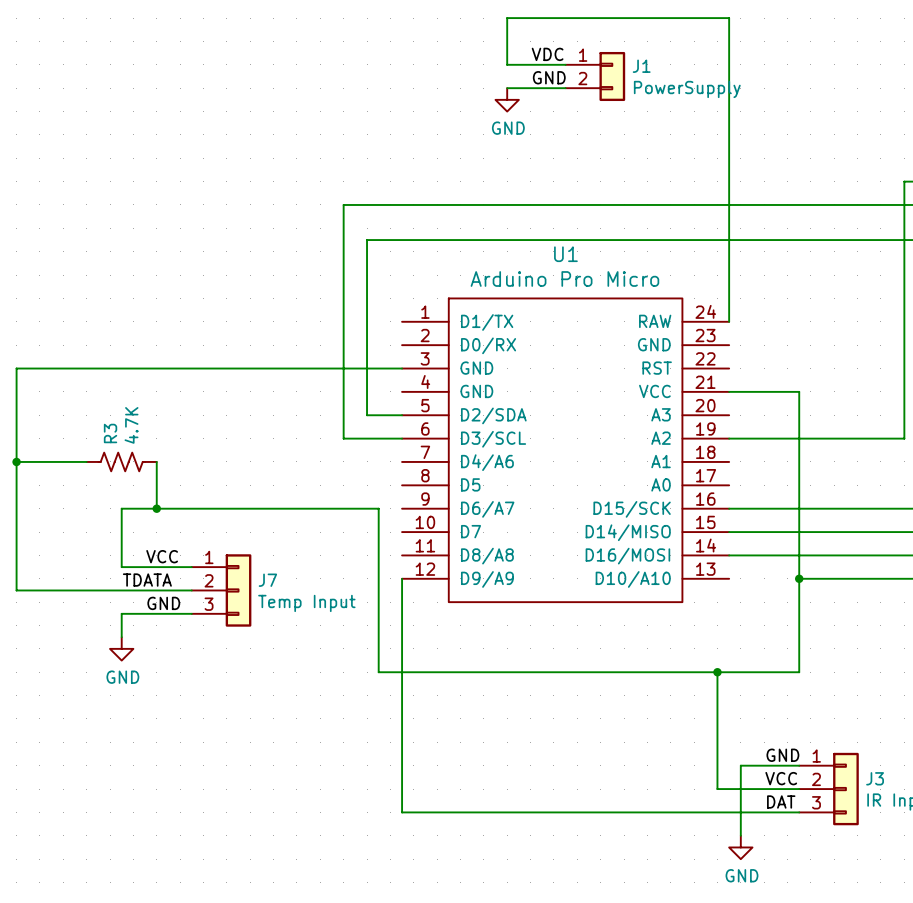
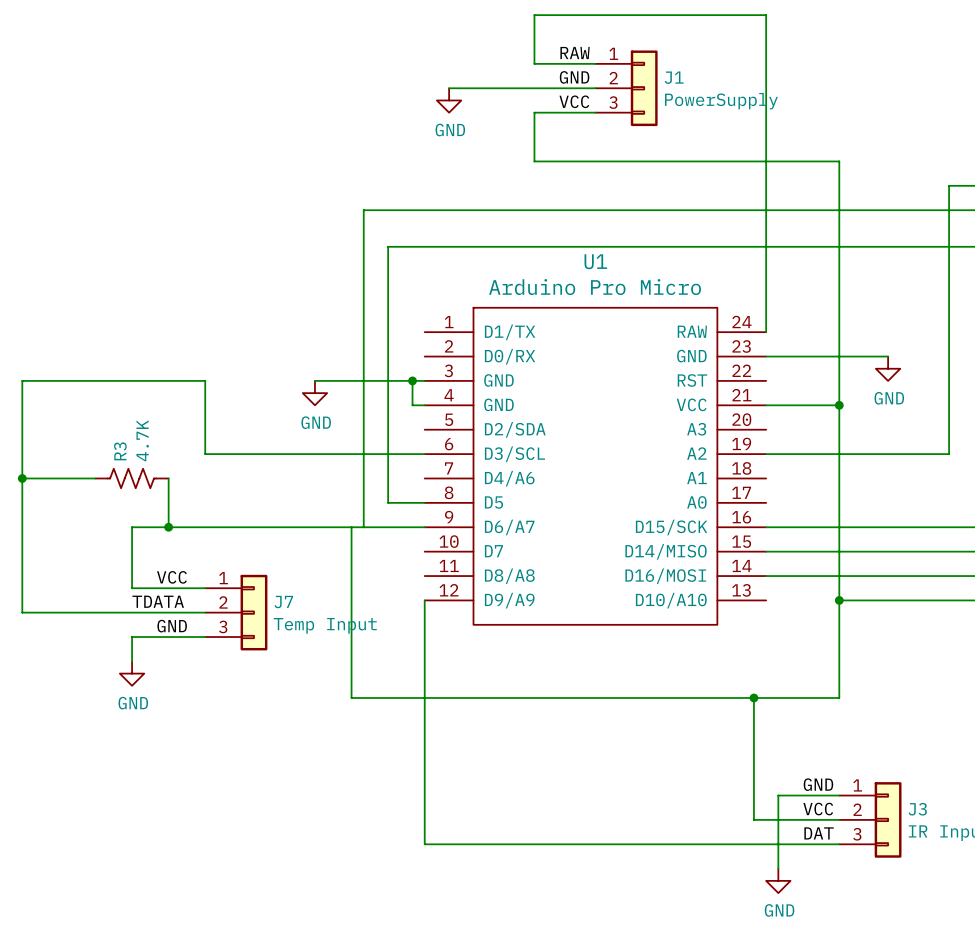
J1 symbol: [565, 51, 626, 102] -> [595, 50, 658, 127]
label: VDC (547, 54) -> RAW (575, 53)
wire: none -> (449, 88) (534, 88)
power symbol position: GND (507, 99) -> GND (449, 100)
label: none -> VCC (574, 101)
wire: none -> (595, 112) (534, 112) (534, 161) (839, 161) (839, 405)
wire: none -> (766, 356) (888, 356)
power symbol: none -> GND (888, 368)
wire: (191, 368) (296, 368) -> (205, 380) (205, 454) (363, 454) (363, 527)
wire: none -> (412, 380) (412, 405) (424, 405)
junction: none -> (412, 380)
power symbol: none -> GND (314, 393)
junction: none -> (839, 405)
wire: (367, 415) (402, 415) -> (388, 429) (388, 502) (424, 502)
wire: (378, 508) (378, 672) -> (351, 527) (351, 697) (400, 697)
wire: none -> (400, 527) (424, 527)

